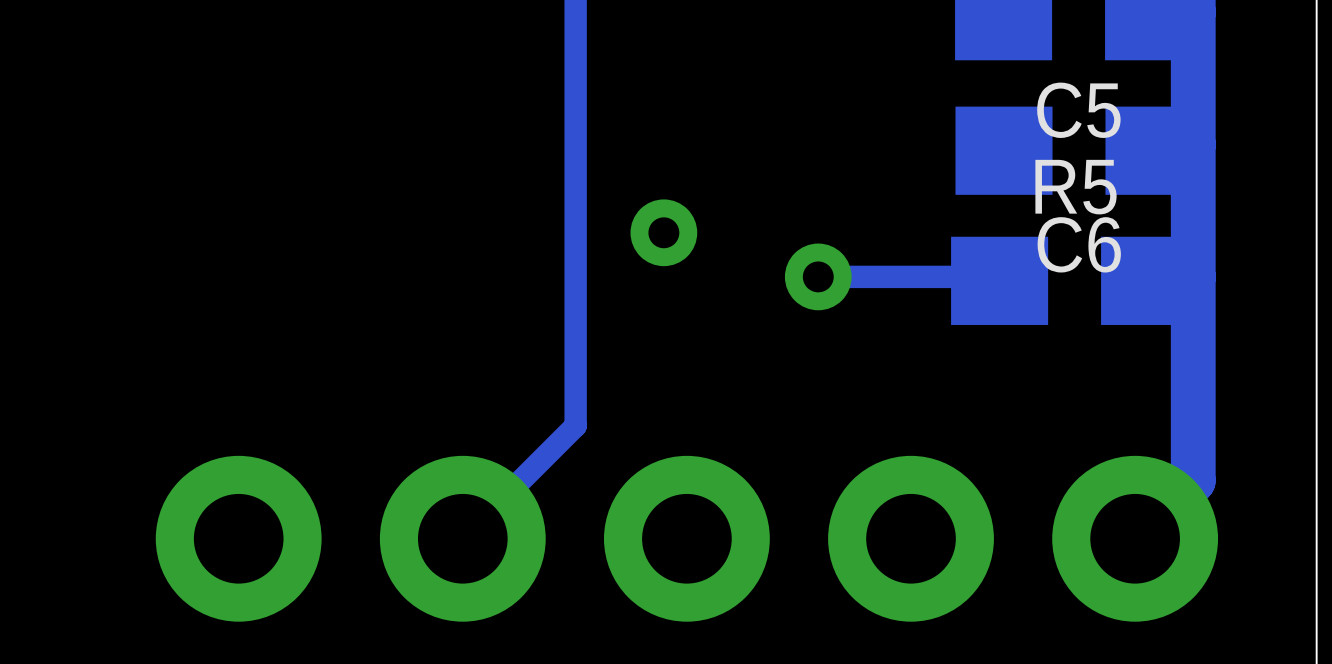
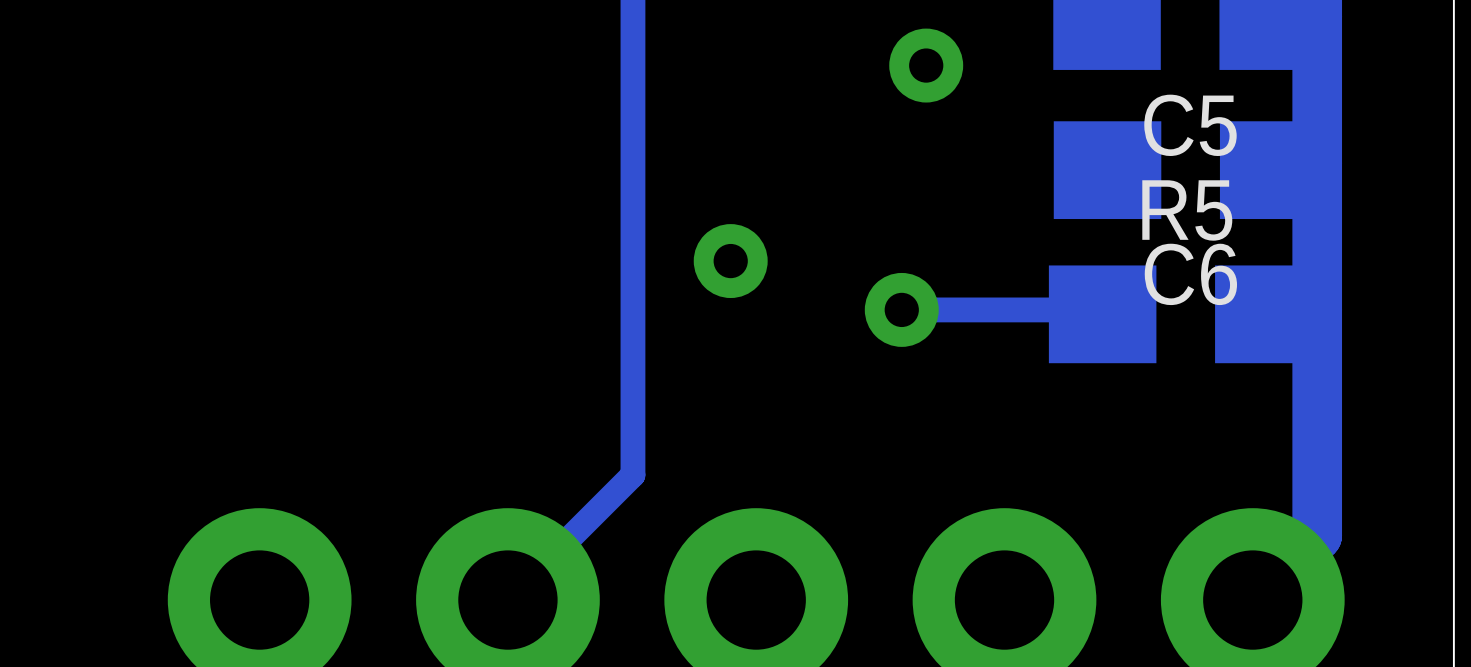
via: none -> (926, 65)

